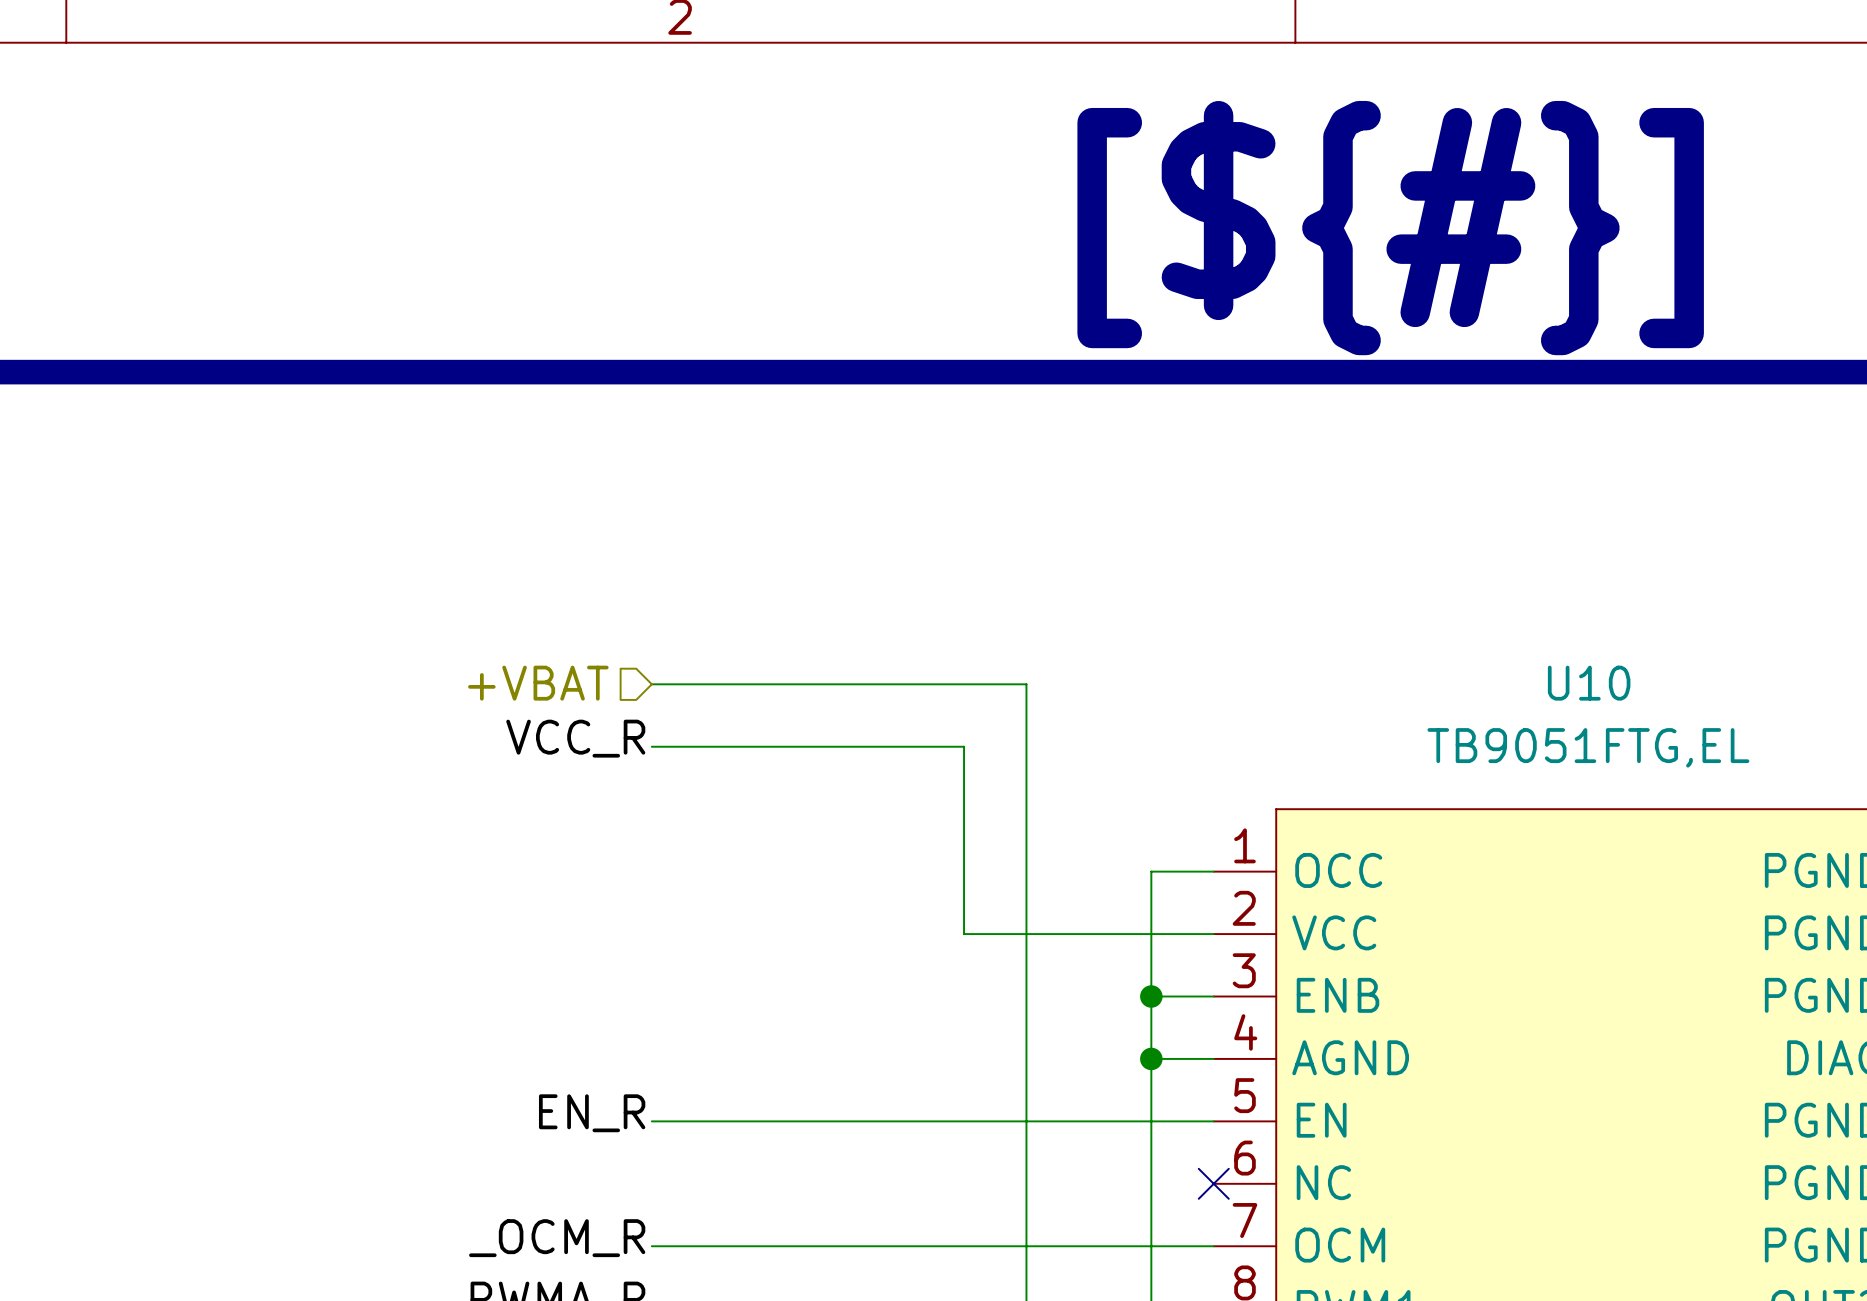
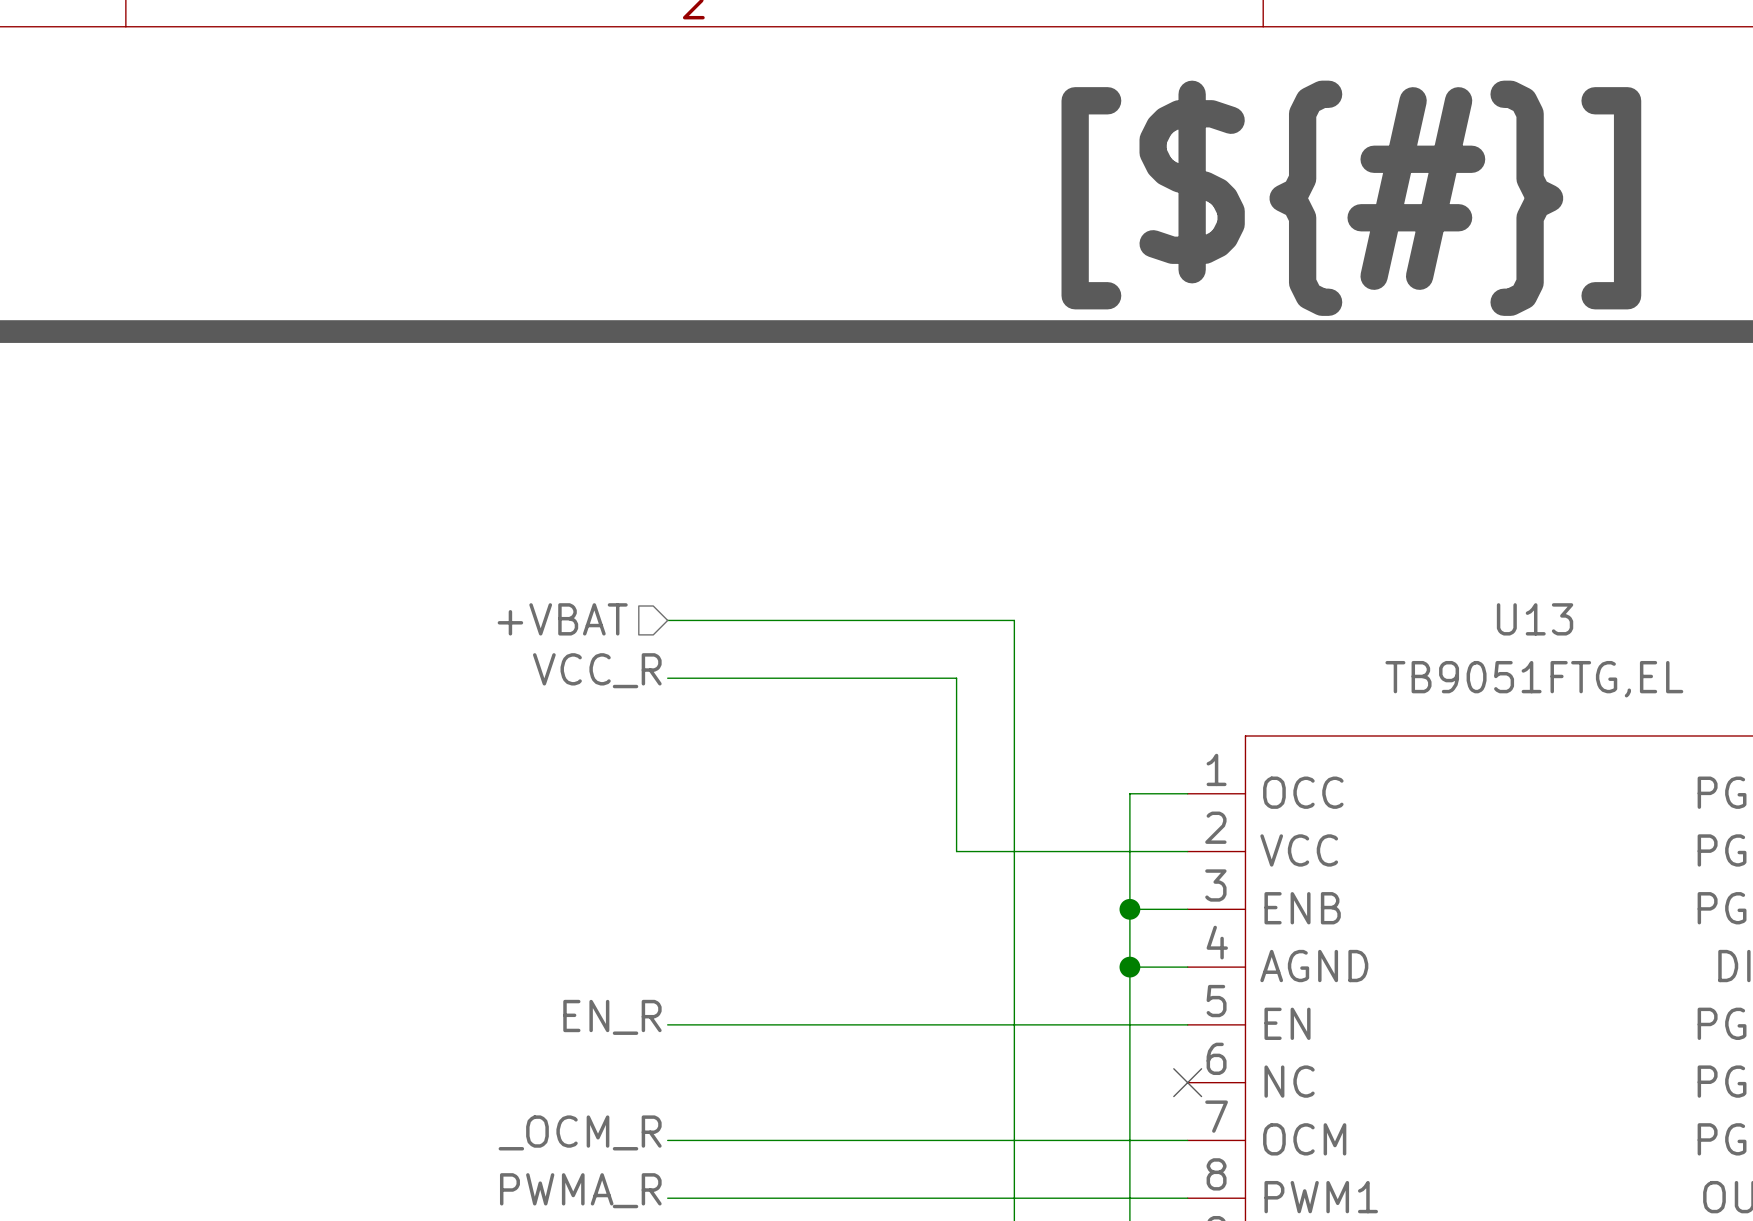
U10 name: U10 (1589, 683) -> U13 (1535, 619)

